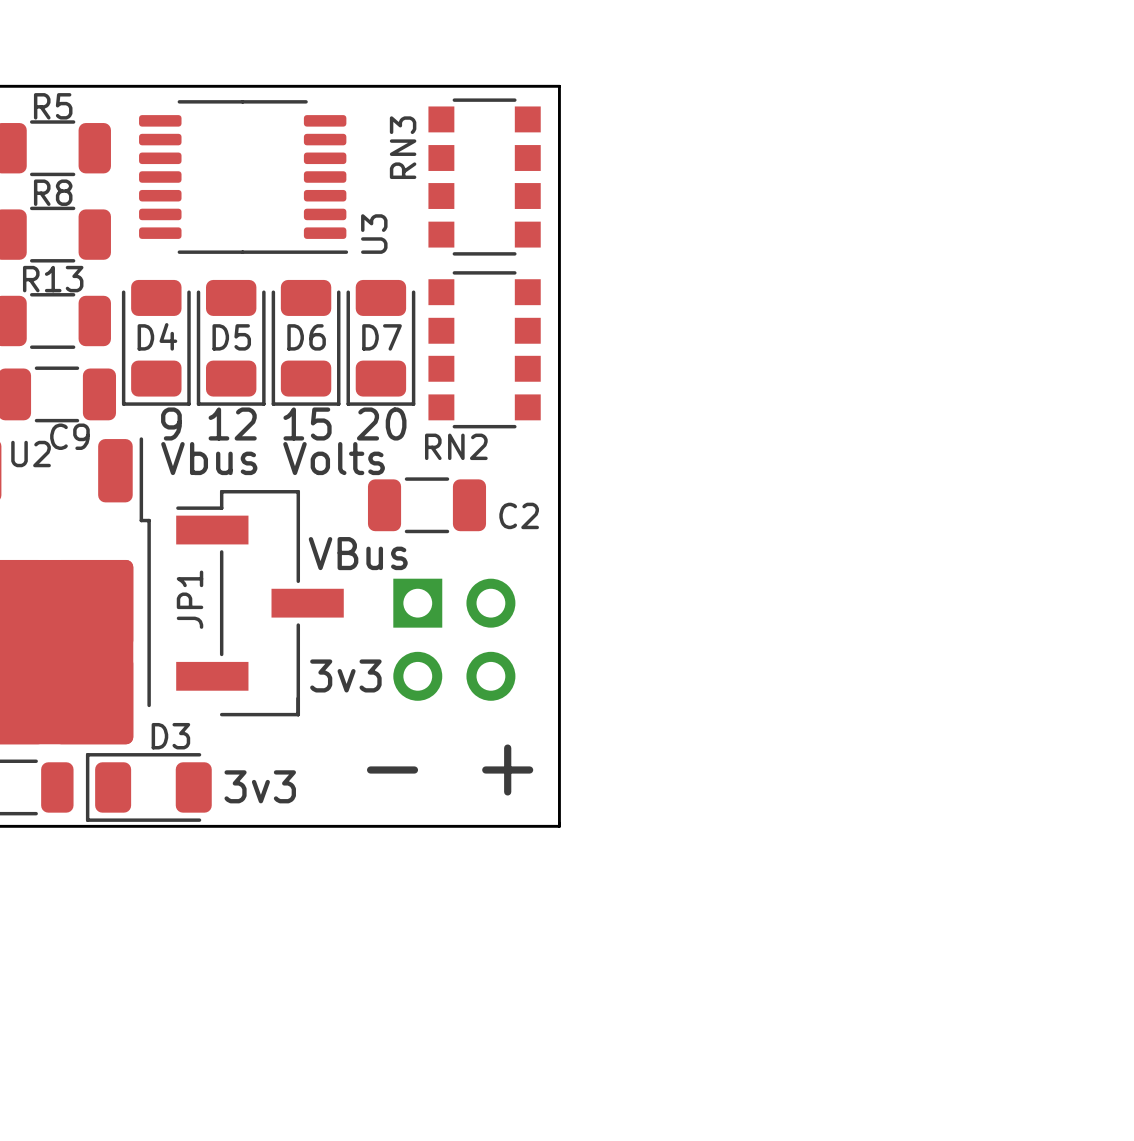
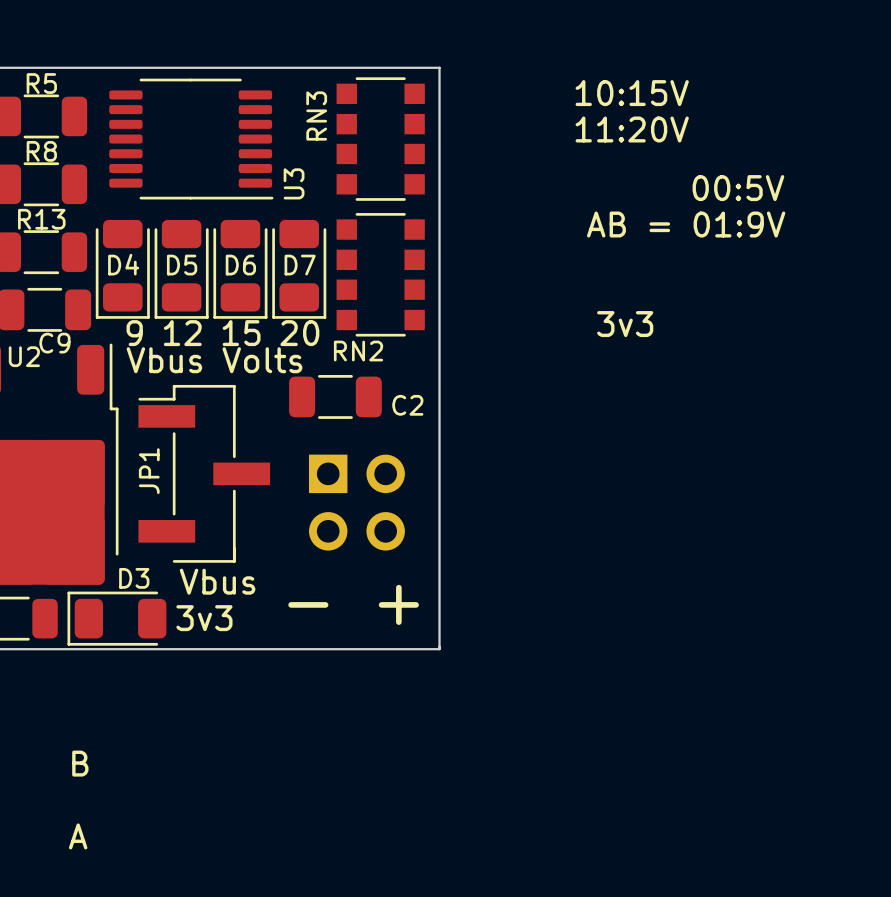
text: none -> 10:15V (632, 93)
text: none -> 11:20V (632, 129)
text: none -> 00:5V (738, 188)
text: none -> AB = 01:9V (686, 224)
text: VBus (358, 553) -> none
text position: 3v3 (345, 675) -> 3v3 (625, 324)
text: none -> Vbus (217, 581)
text: none -> B (80, 763)
text: none -> A (78, 836)

